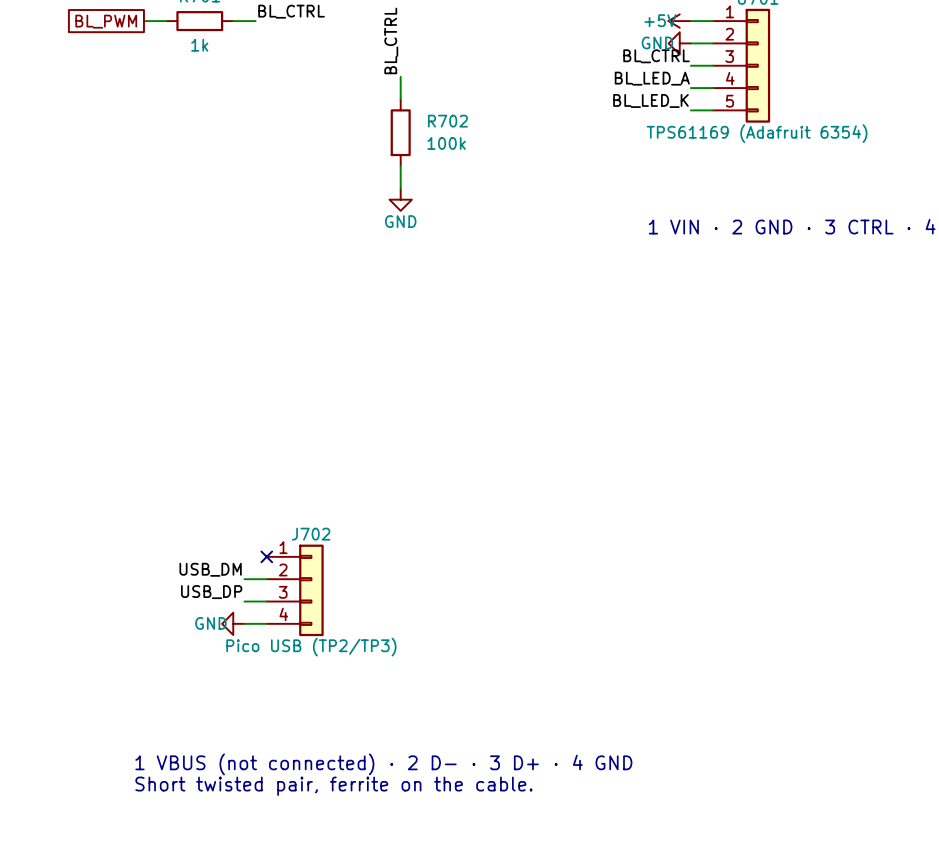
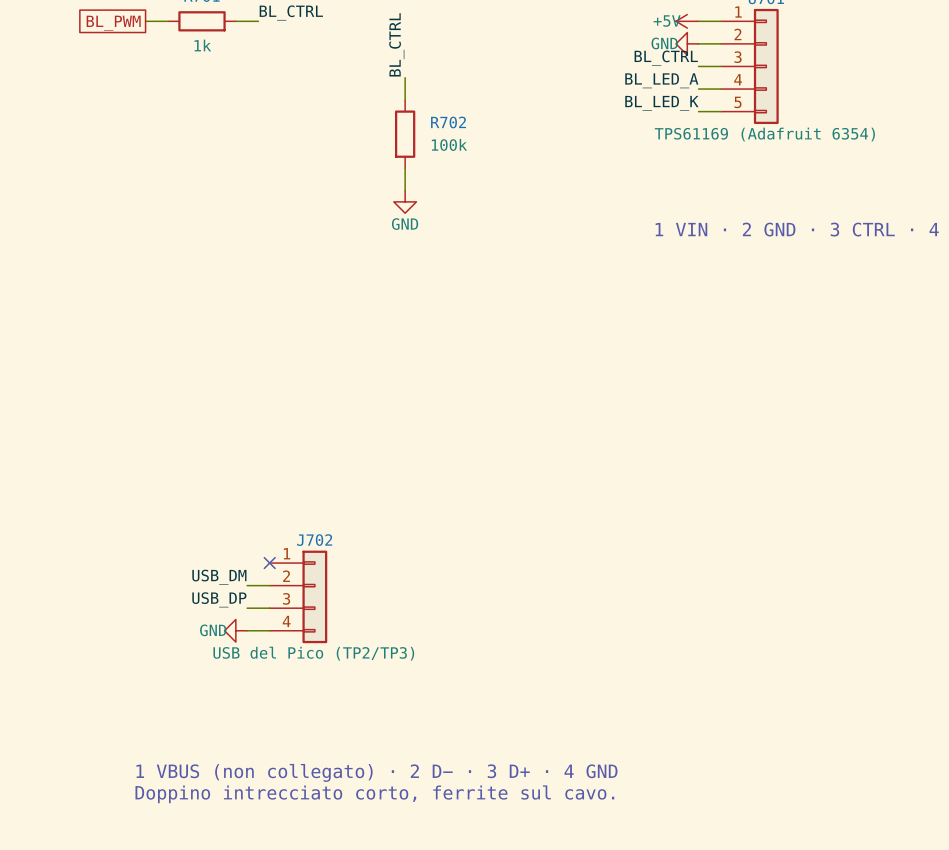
J702 value: Pico USB (TP2/TP3) (311, 647) -> USB del Pico (TP2/TP3) (313, 653)
text: 1 VBUS (not connected) · 2 D− · 3 D+ · 4 GND (383, 764) -> 1 VBUS (non collegato) · 2 D− · 3 D+ · 4 GND (376, 772)
text: Short twisted pair, ferrite on the cable. (333, 786) -> Doppino intrecciato corto, ferrite sul cavo. (374, 794)

